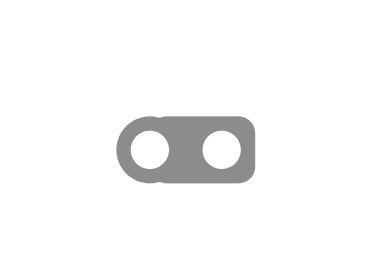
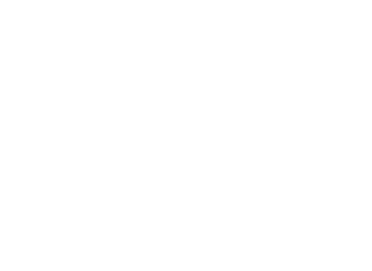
part: (185, 149) -> none

